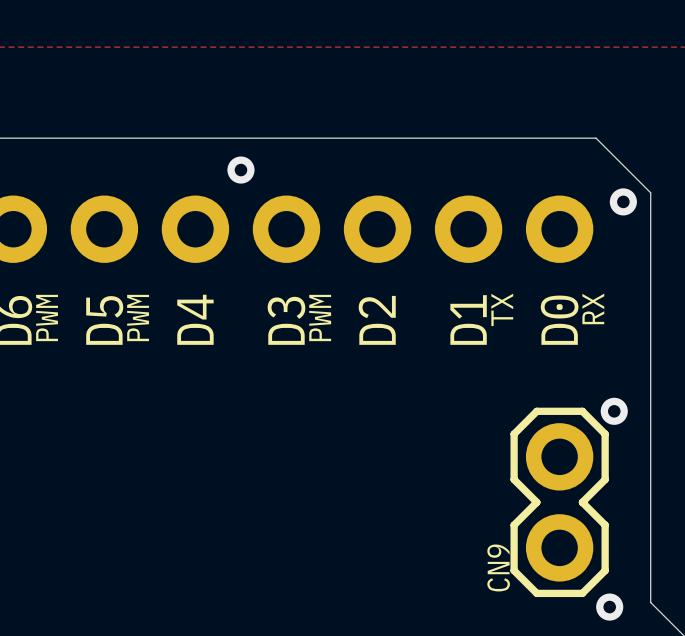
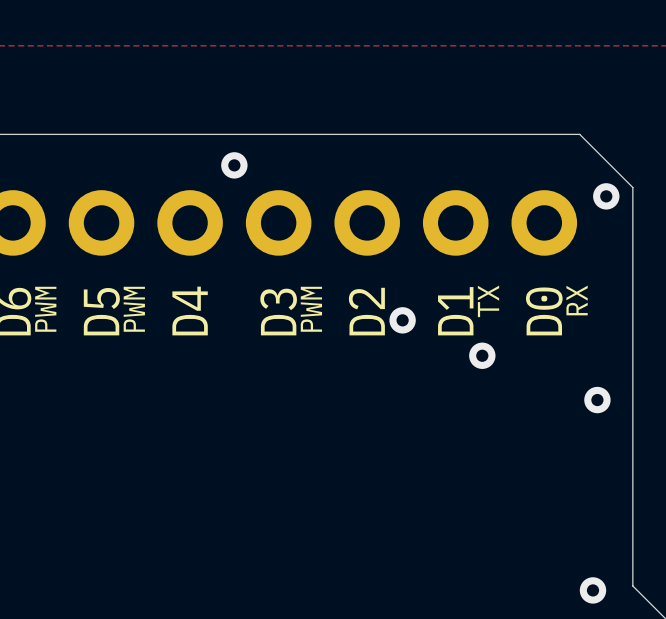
via: none -> (402, 320)
via: none -> (482, 355)
CN9: (559, 502) -> none

